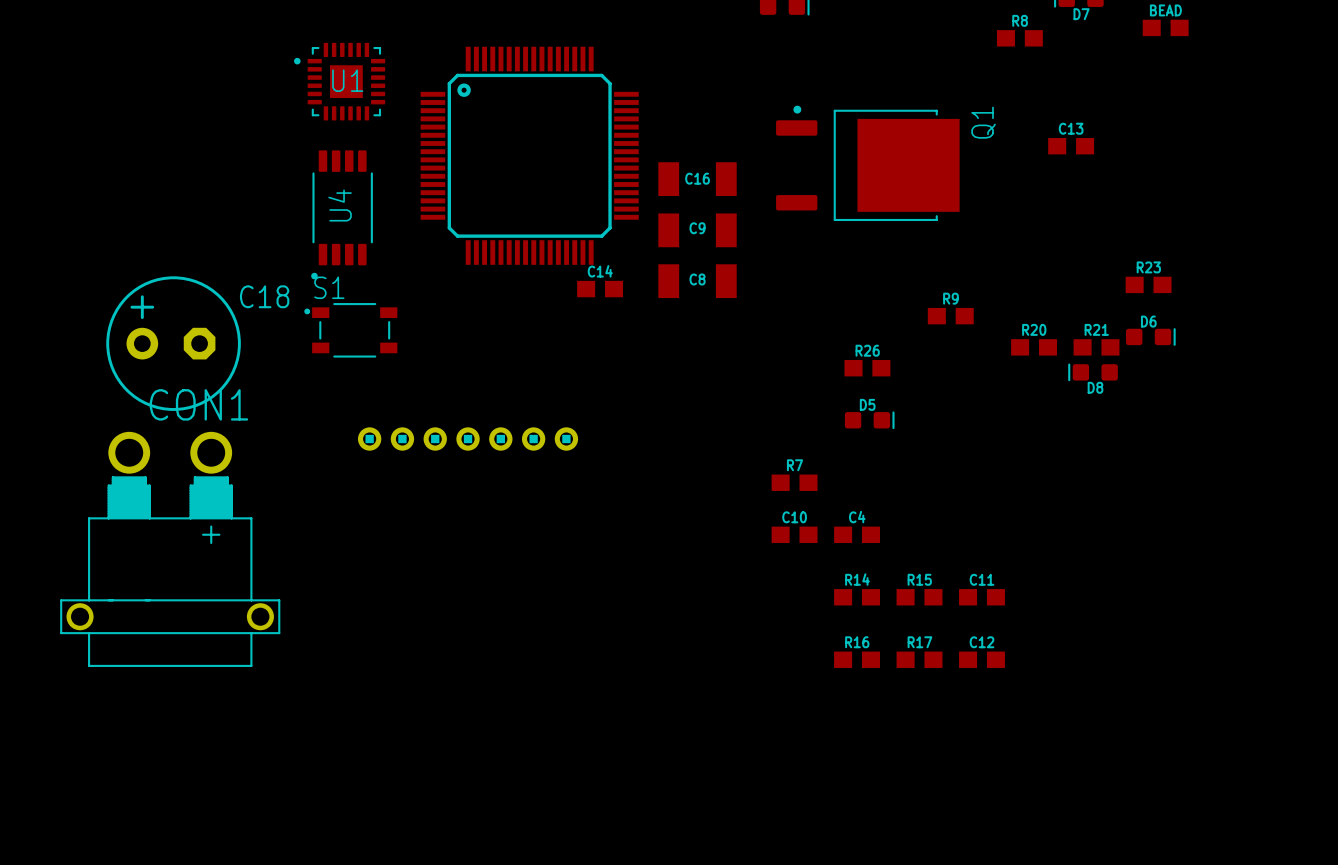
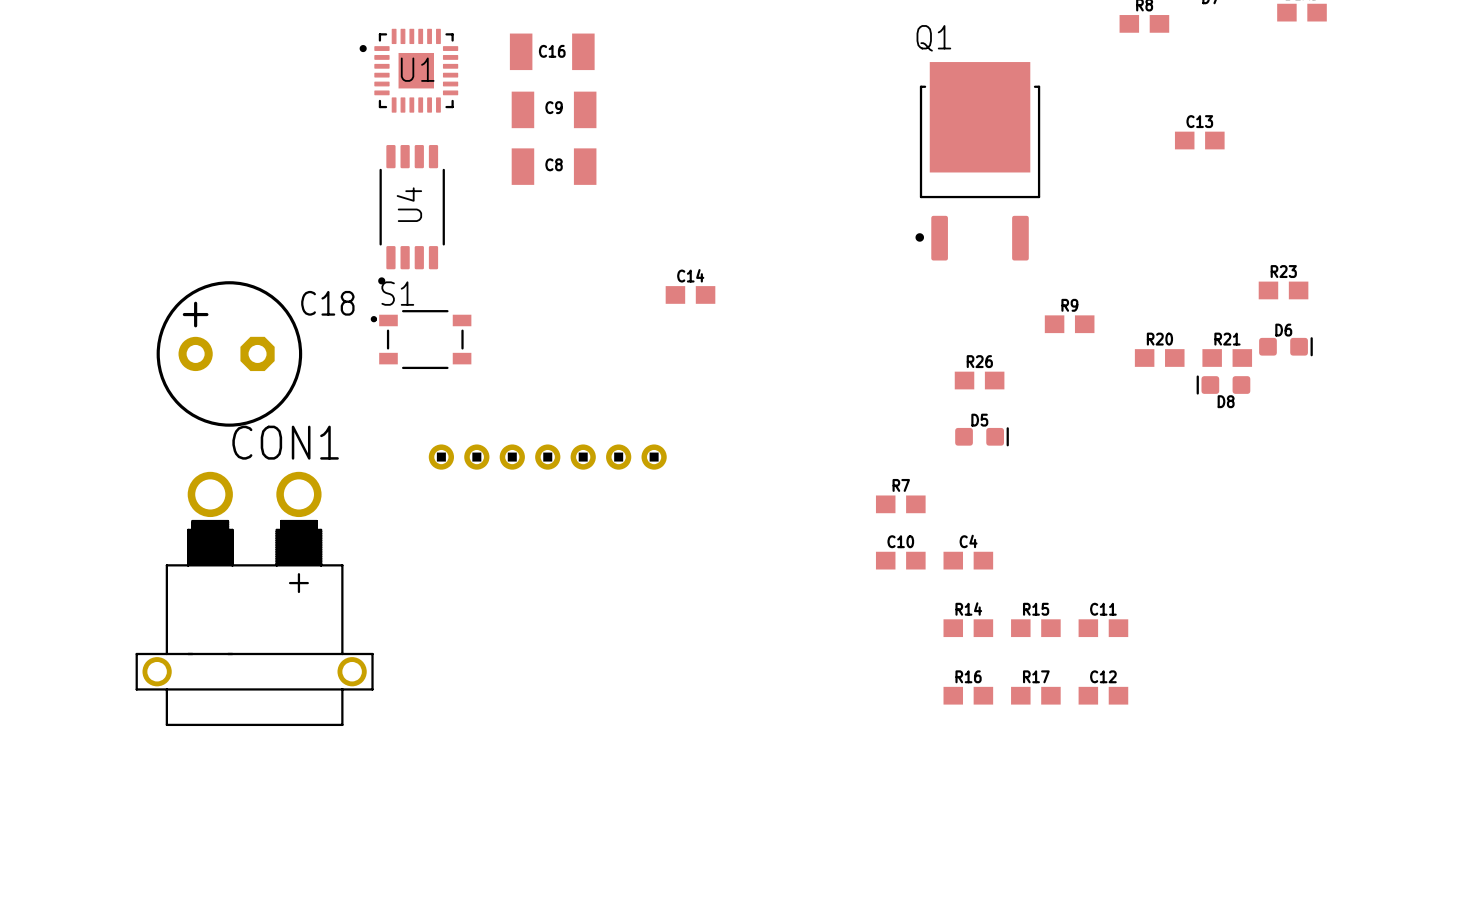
part: (529, 155) -> none
Q1 rotation: 0° (867, 163) -> 90° counterclockwise (977, 161)
C16 position: (697, 179) -> (552, 51)
C9 position: (697, 230) -> (554, 109)
C8 position: (697, 281) -> (554, 166)
CON1 position: (170, 549) -> (254, 598)

